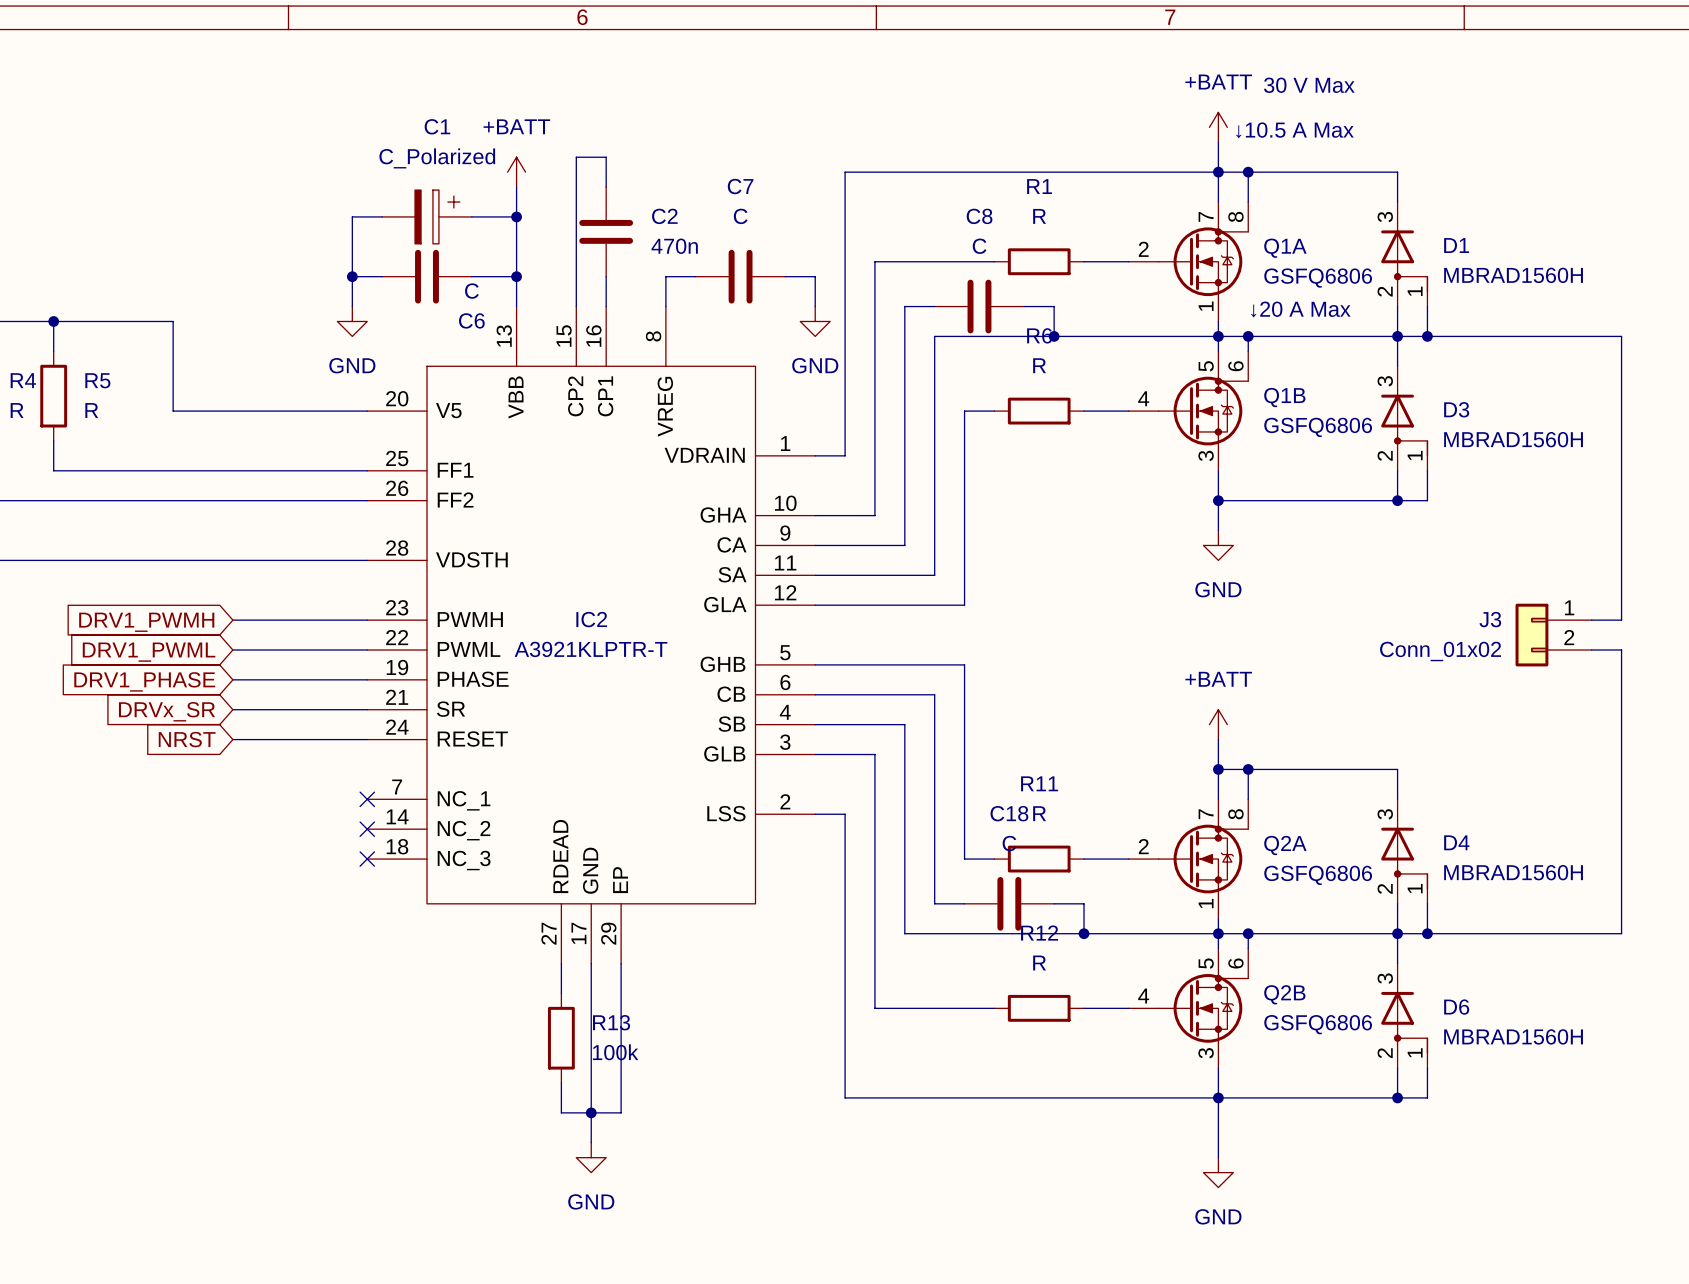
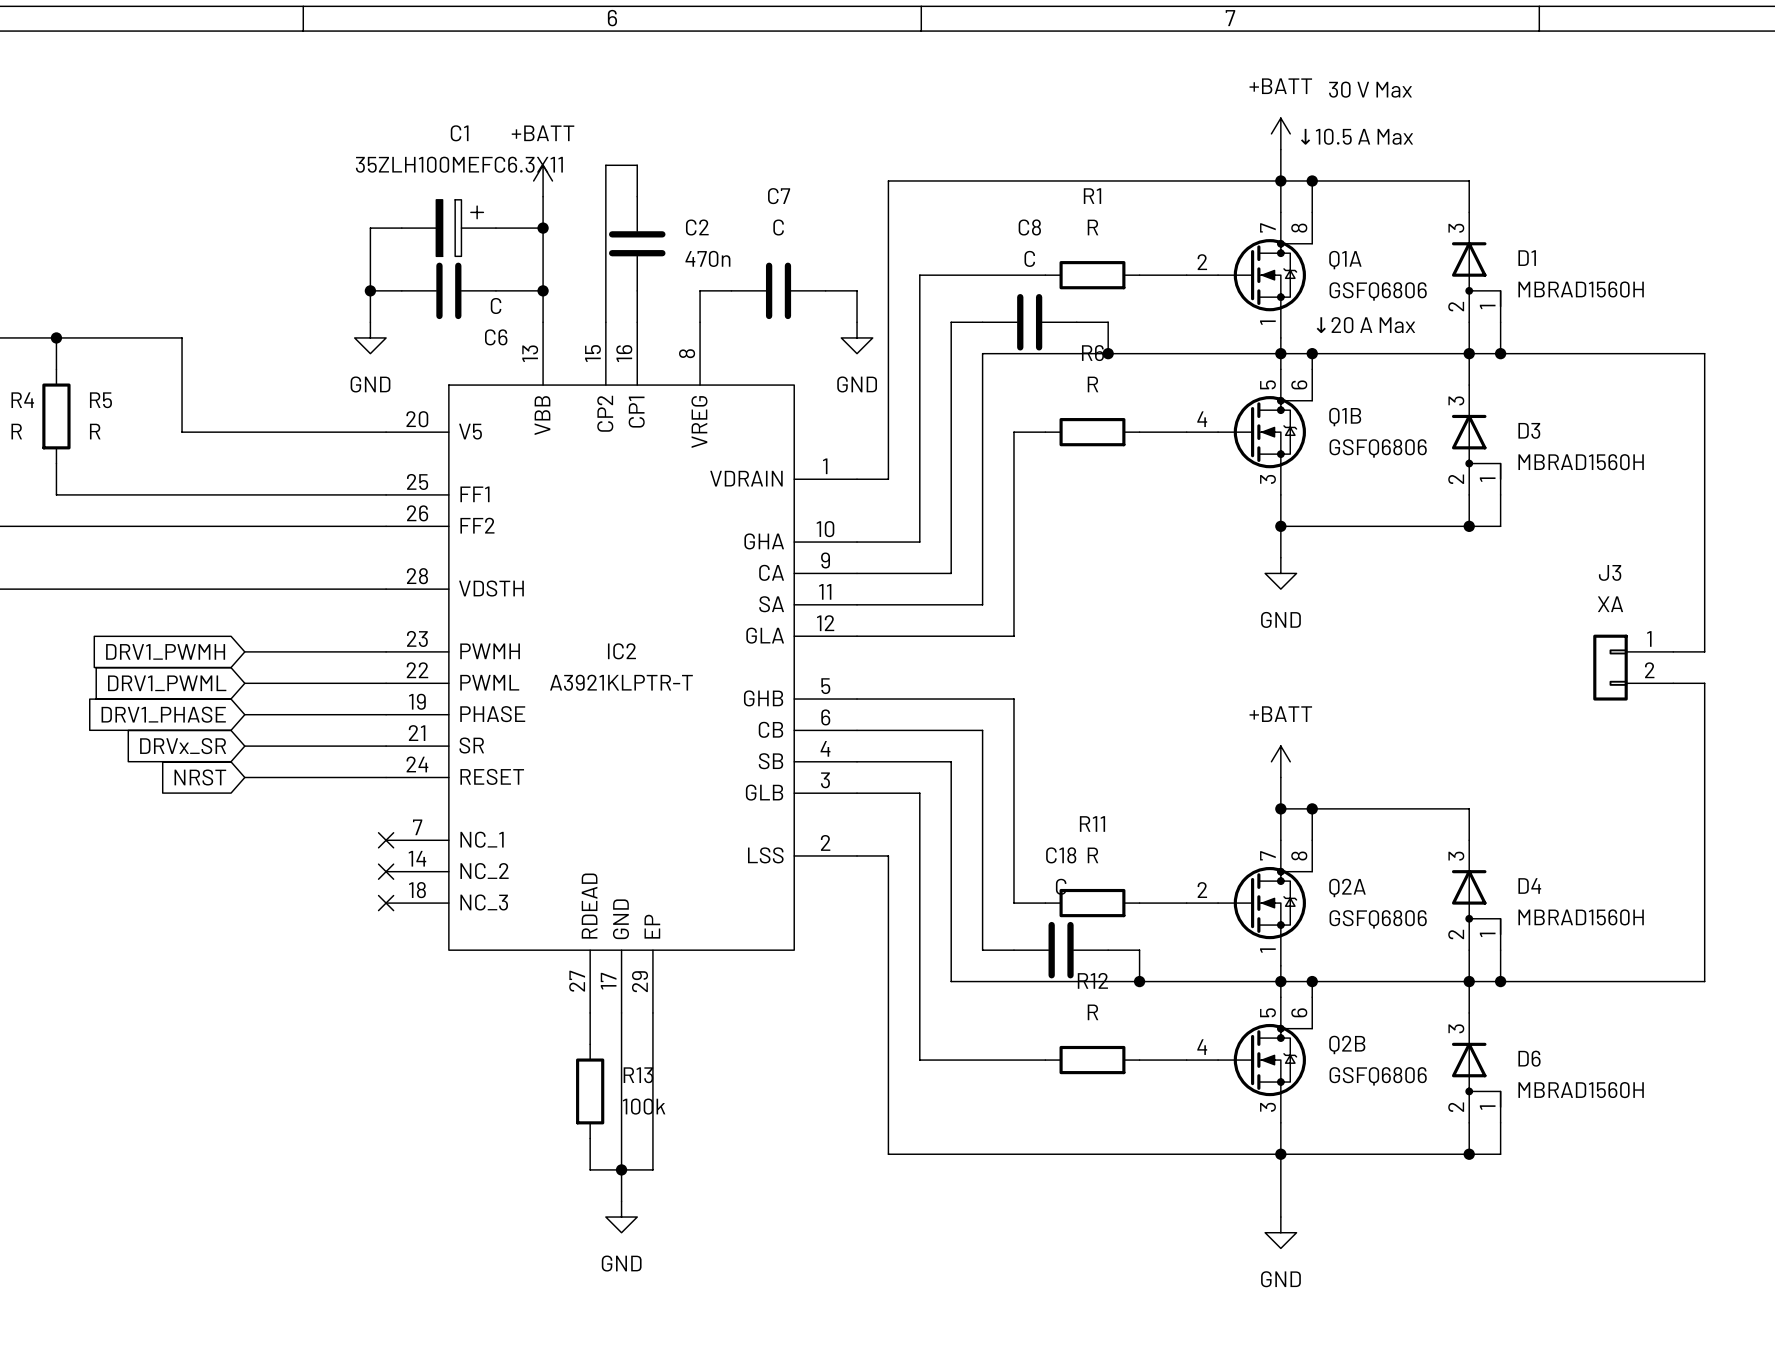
C1 value: C_Polarized (437, 158) -> 35ZLH100MEFC6.3X11 (459, 164)
J3 name position: J3 (1490, 619) -> J3 (1610, 572)
J3 value: Conn_01x02 (1440, 651) -> XA (1610, 604)

